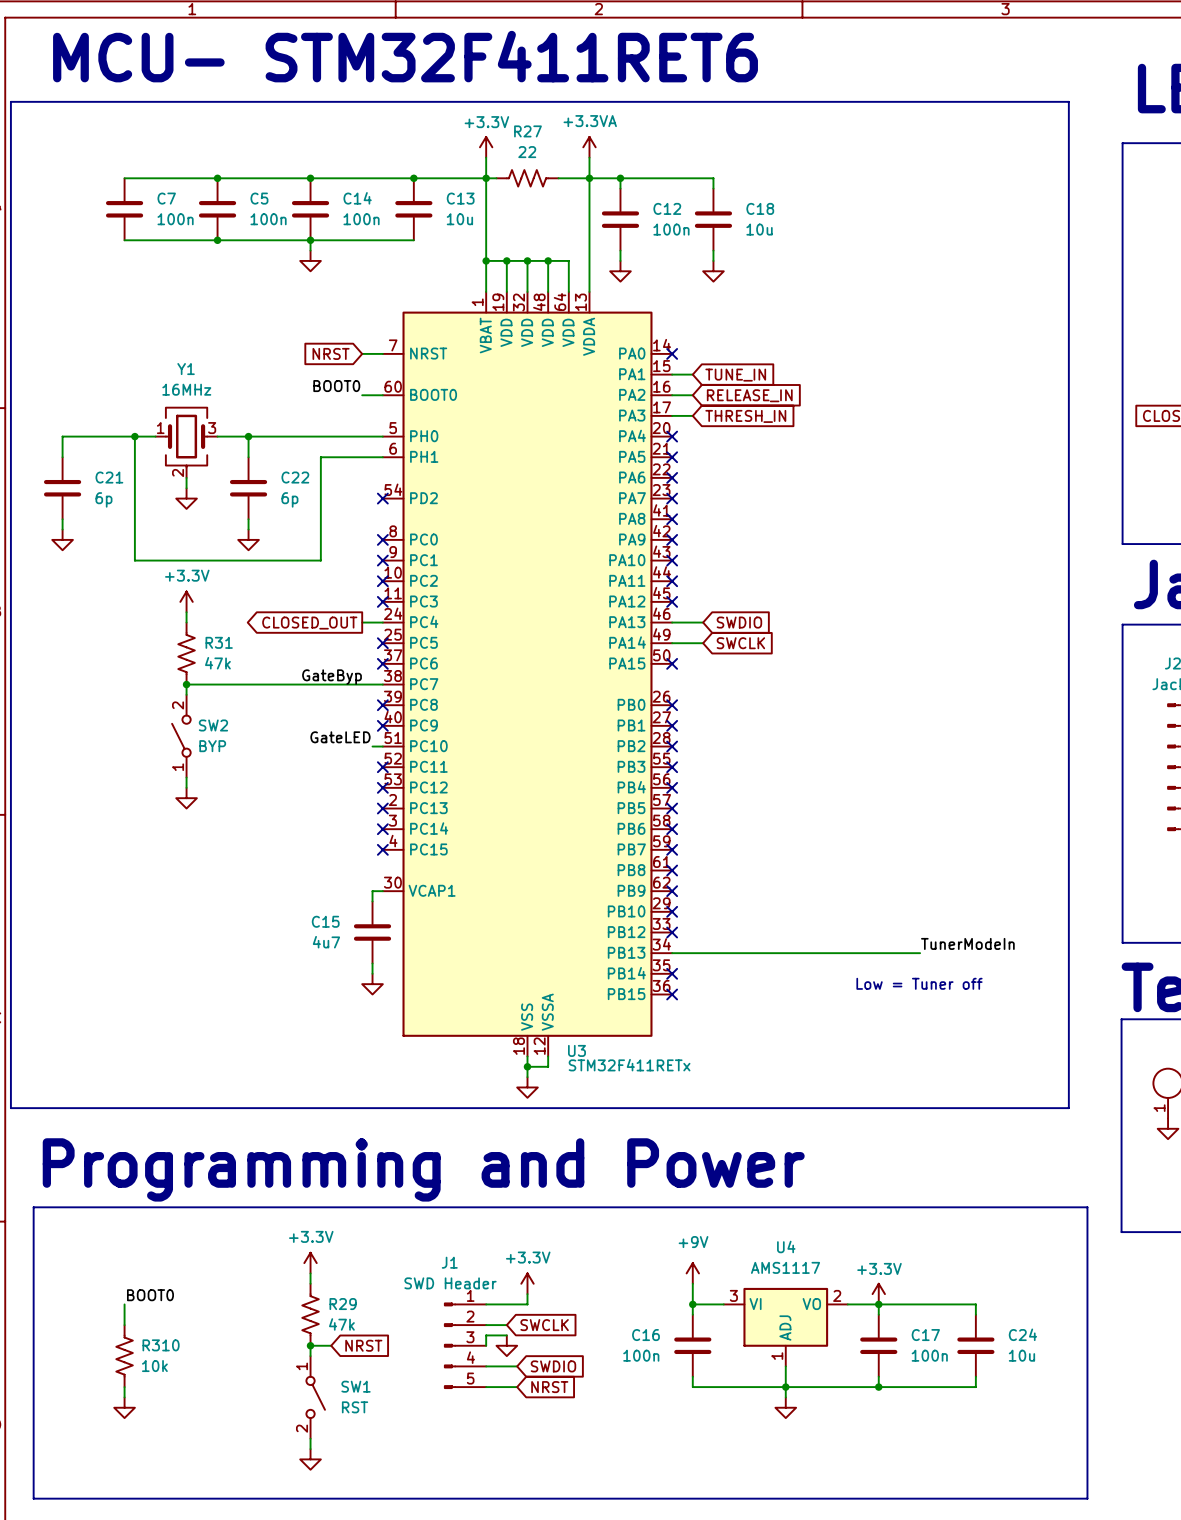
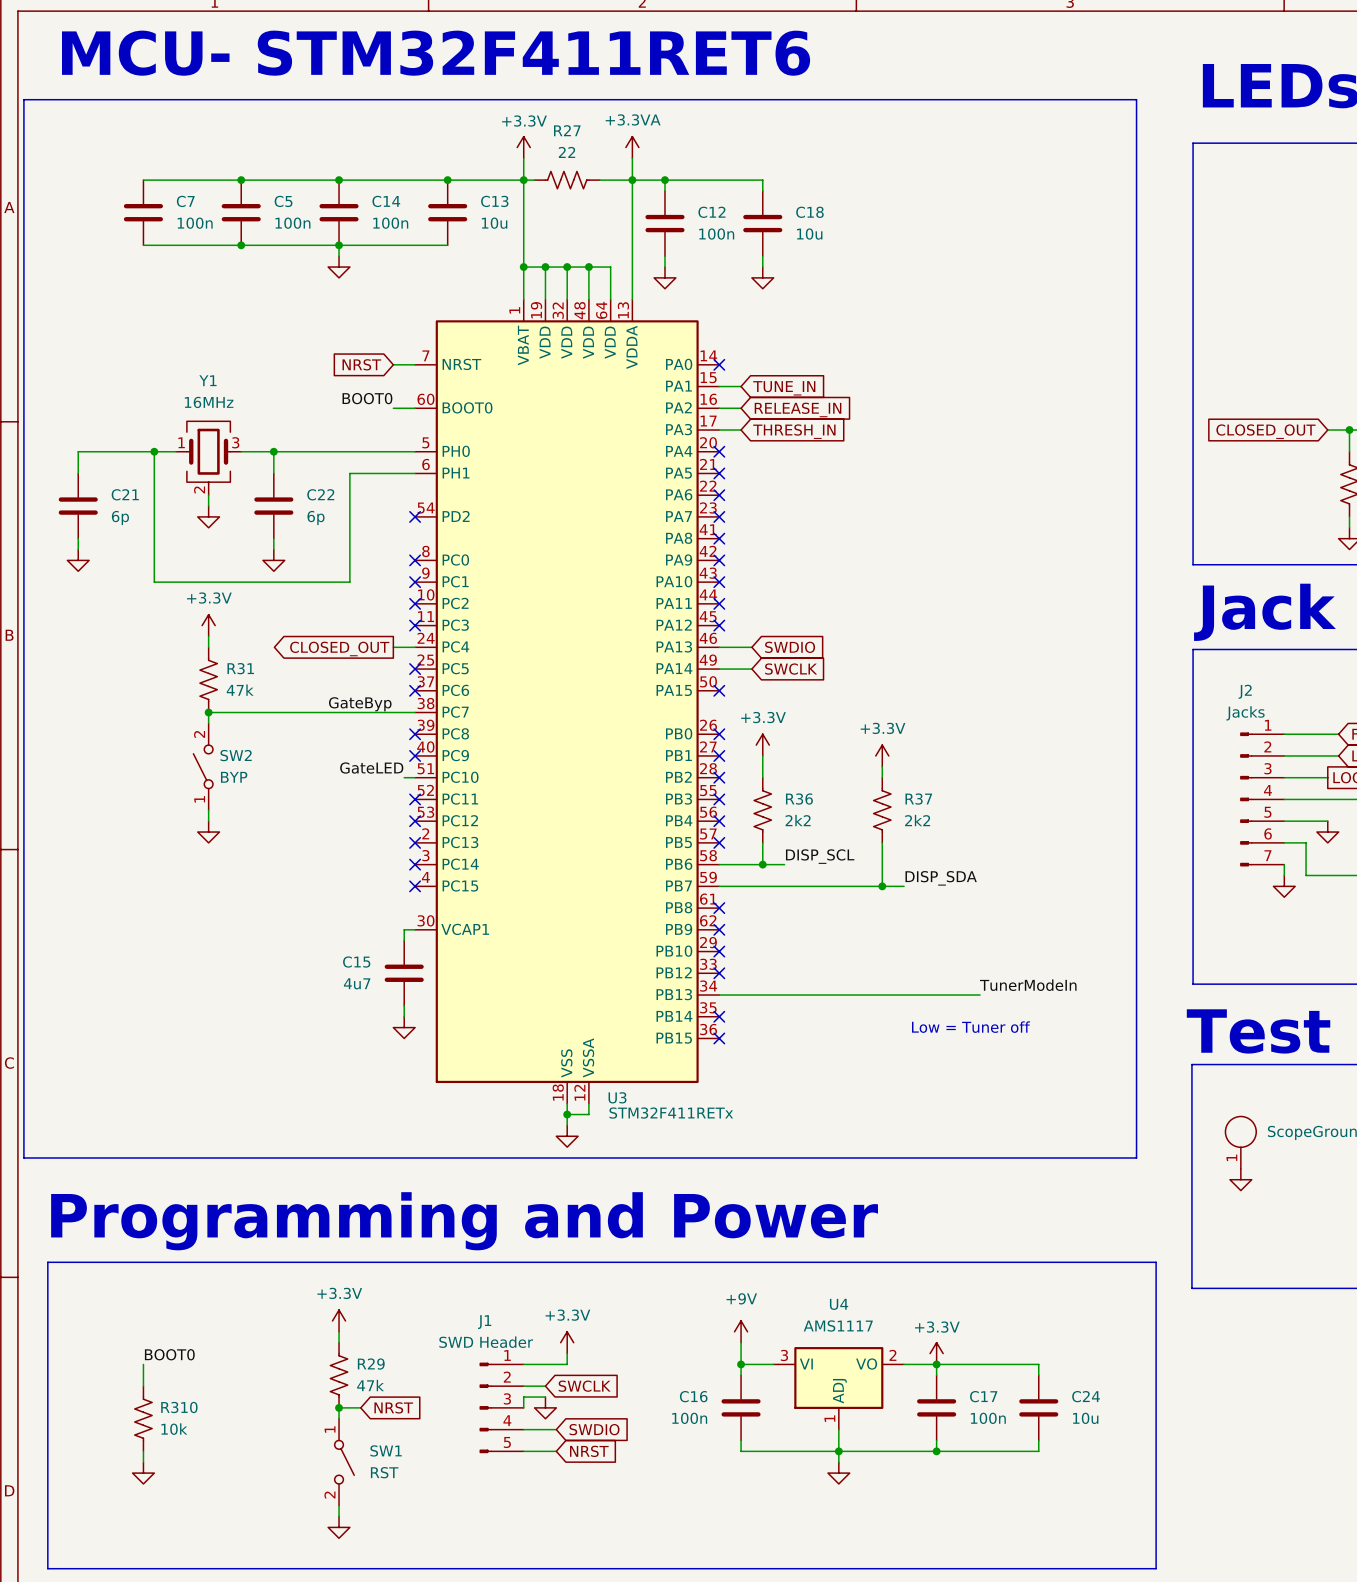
power symbol: none -> +3.3V (762, 745)
wire: none -> (762, 755) (762, 777)
power symbol: none -> +3.3V (882, 755)
wire: none -> (882, 766) (882, 777)
R36: none -> 2k2 (762, 810)
R37: none -> 2k2 (882, 810)
wire: none -> (762, 842) (762, 864)
wire: none -> (882, 842) (882, 886)
label: none -> DISP_SCL (820, 856)
wire: none -> (719, 864) (784, 864)
no-connect mark: (672, 829) -> none
junction: none -> (762, 864)
label: none -> DISP_SDA (941, 878)
wire: none -> (719, 886) (904, 886)
no-connect mark: (672, 849) -> none
junction: none -> (882, 886)

